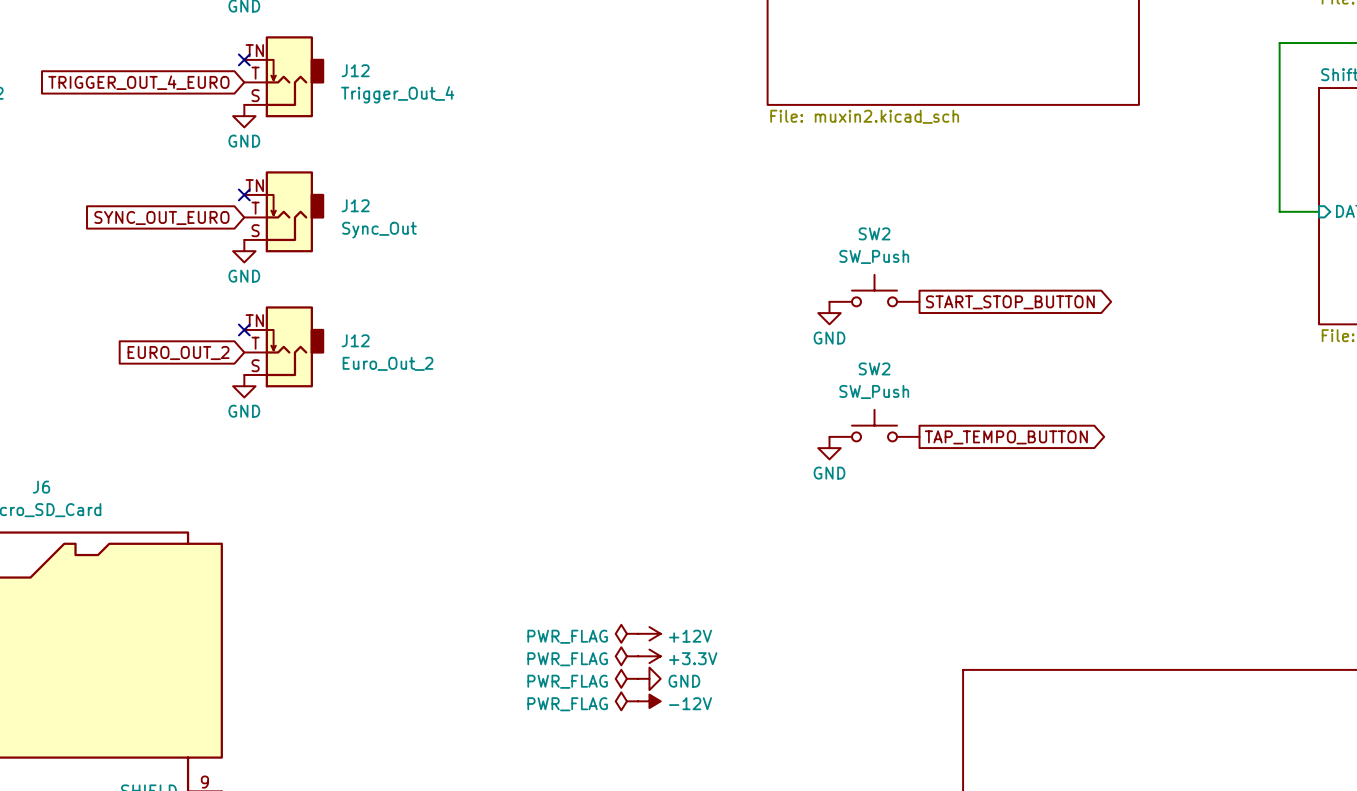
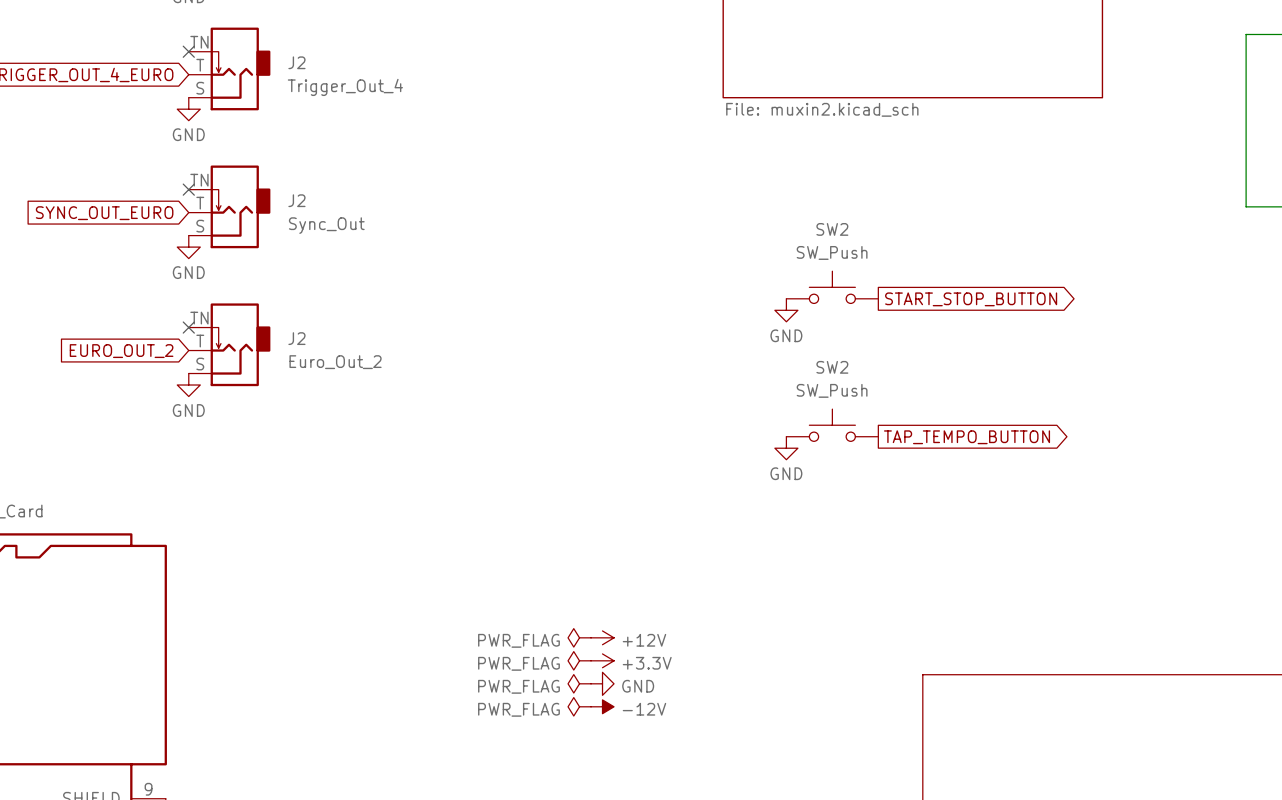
J12 name: J12 (355, 70) -> J2 (296, 62)
J12 name: J12 (355, 205) -> J2 (296, 200)
J12 name: J12 (355, 340) -> J2 (296, 338)

